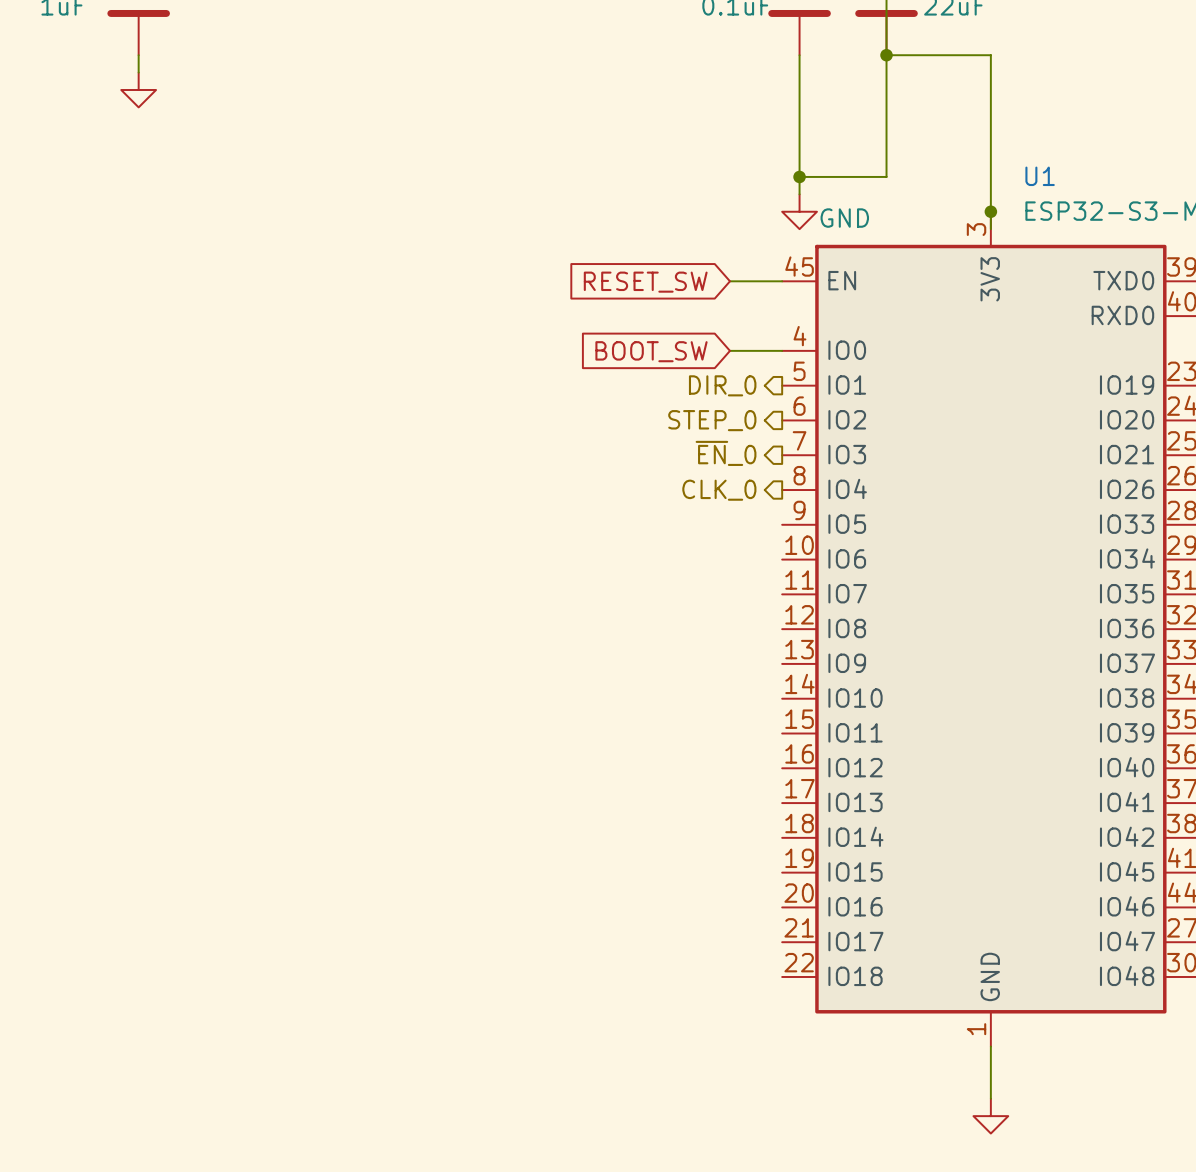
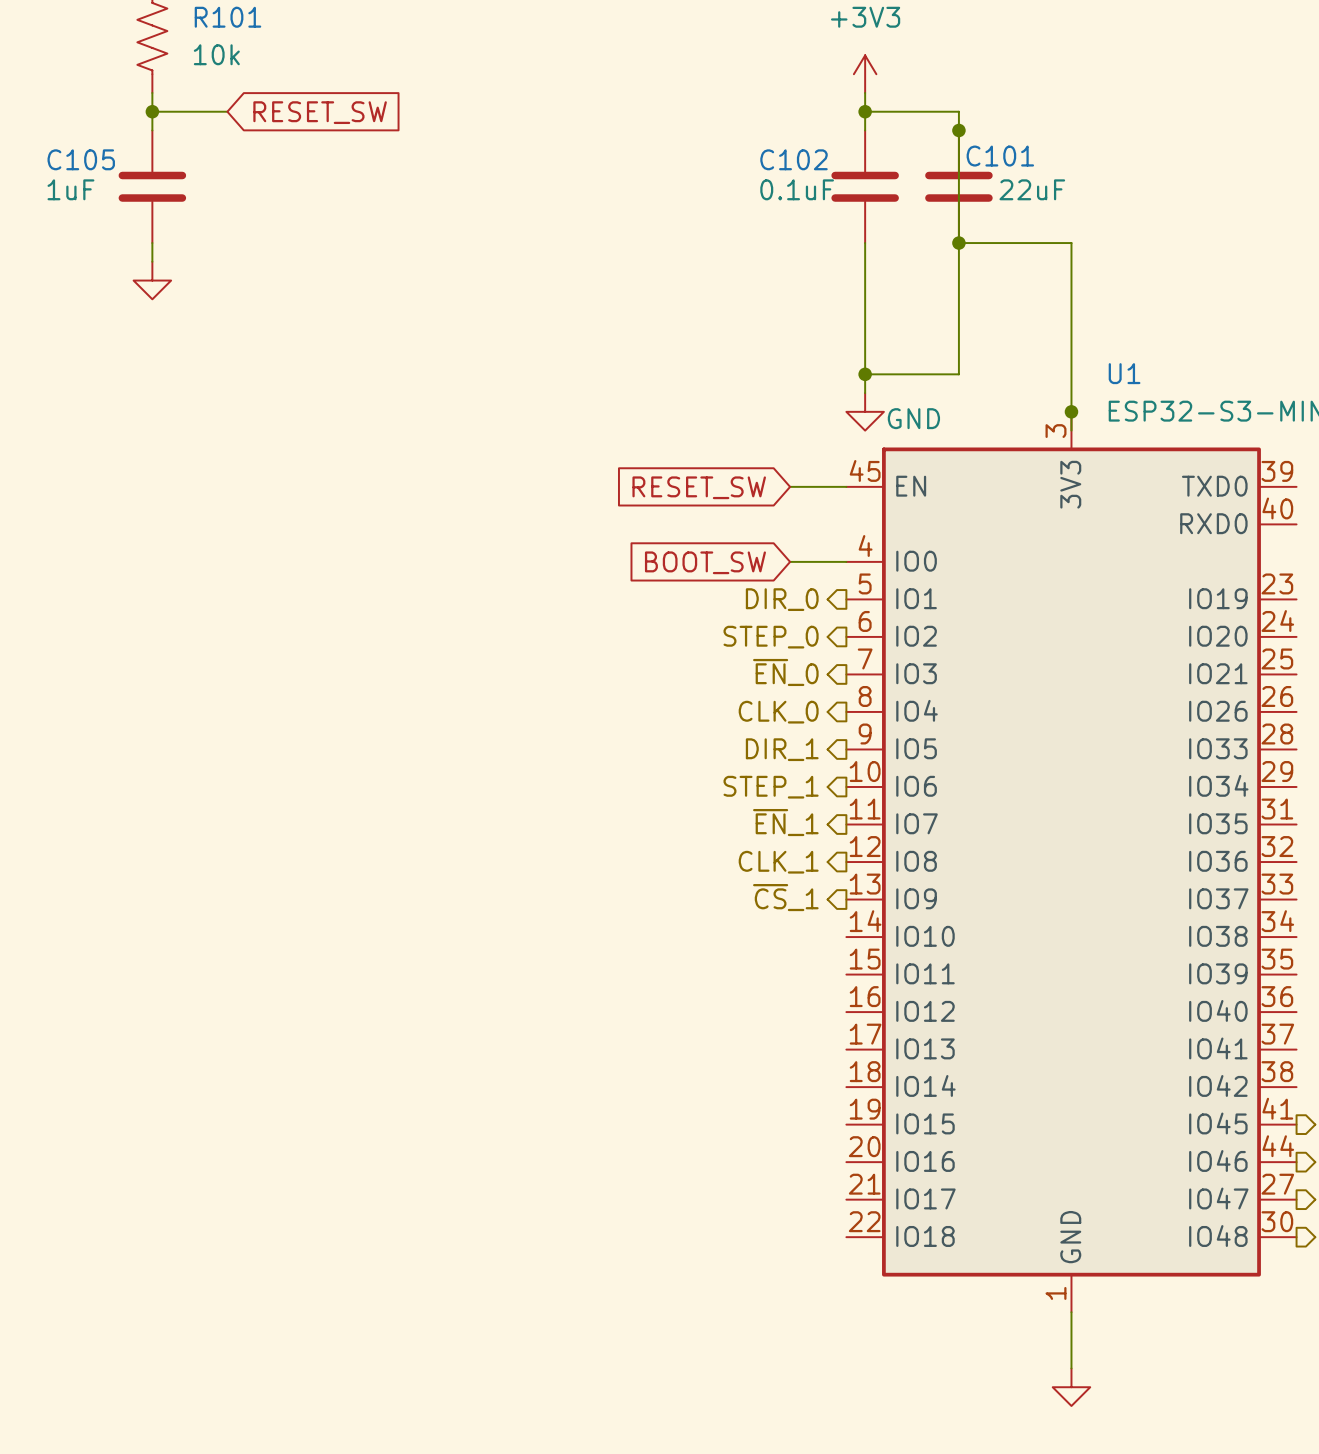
hierarchical label: none -> DIR_1 (782, 749)
hierarchical label: none -> STEP_1 (771, 787)
hierarchical label: none -> ~{EN}_1 (785, 822)
hierarchical label: none -> CLK_1 (778, 862)
hierarchical label: none -> ~{CS}_1 (785, 897)

